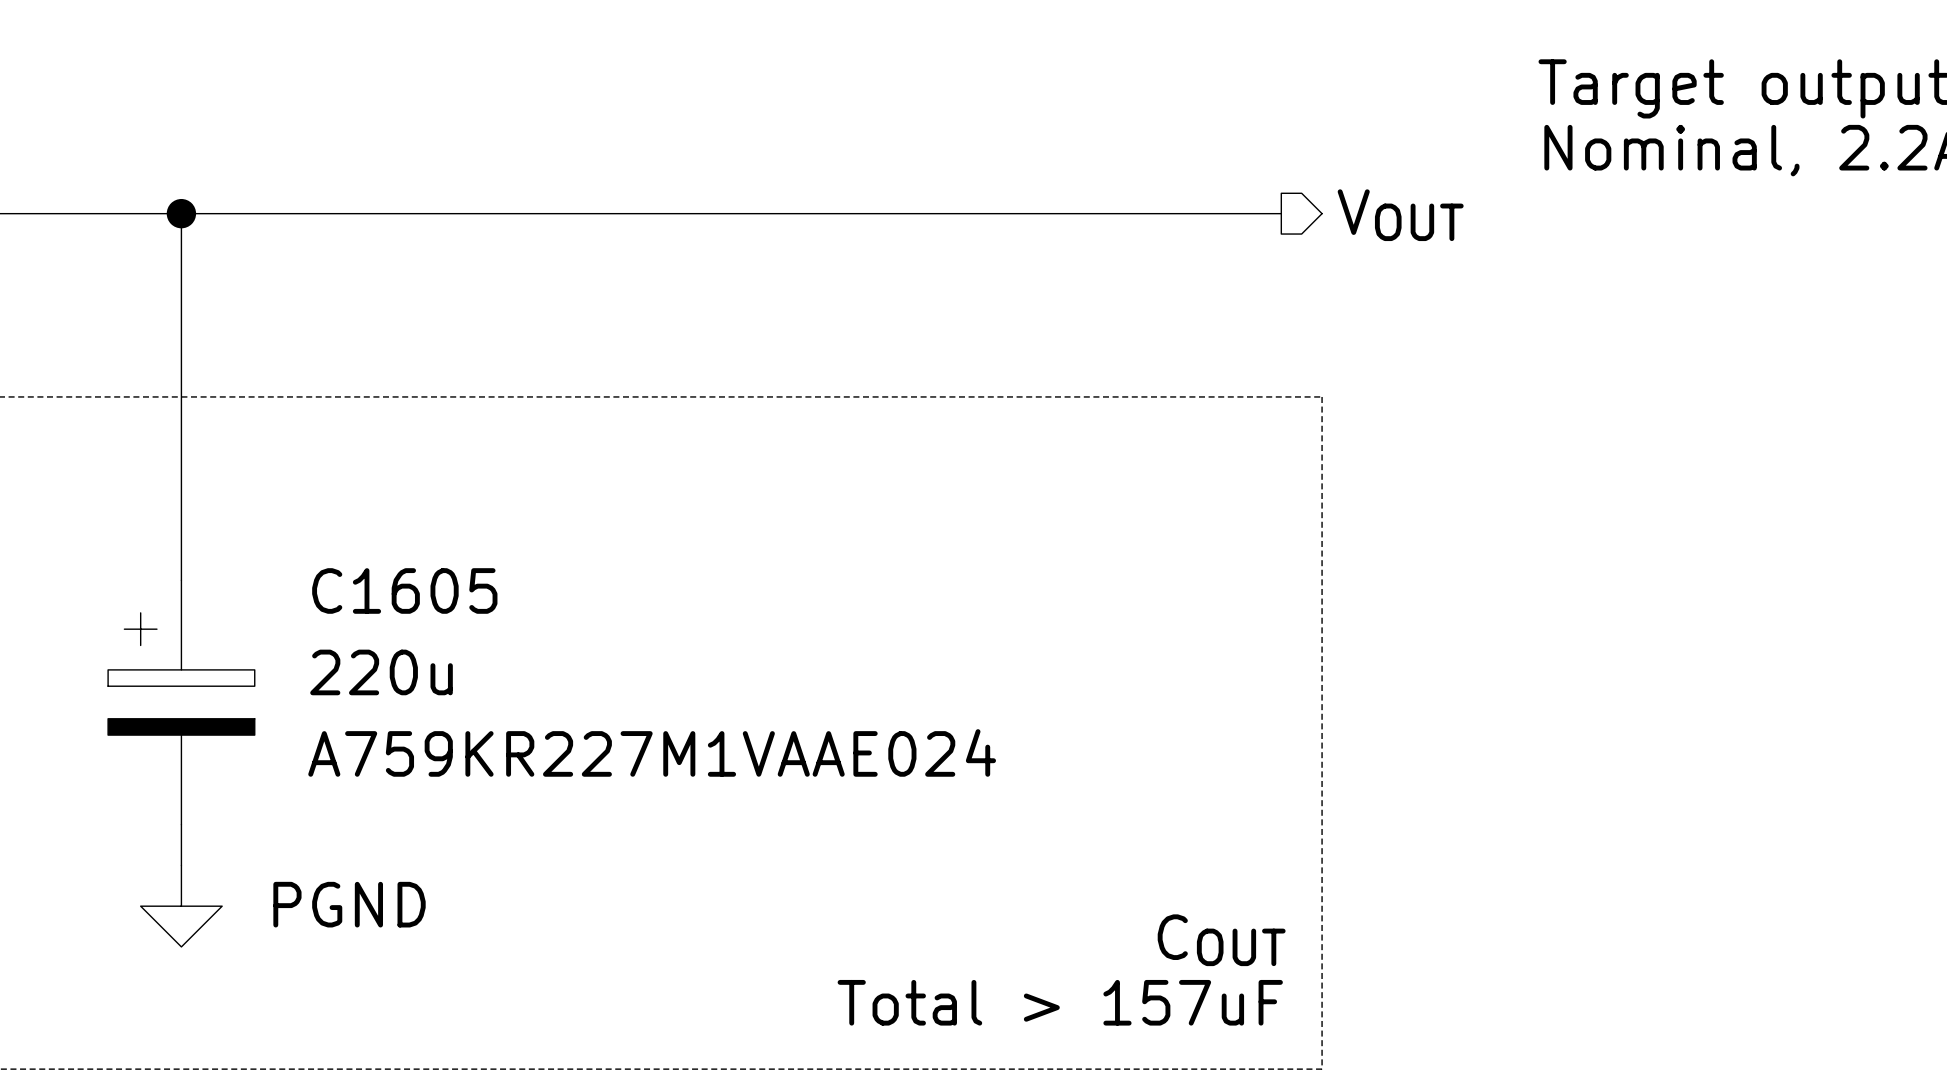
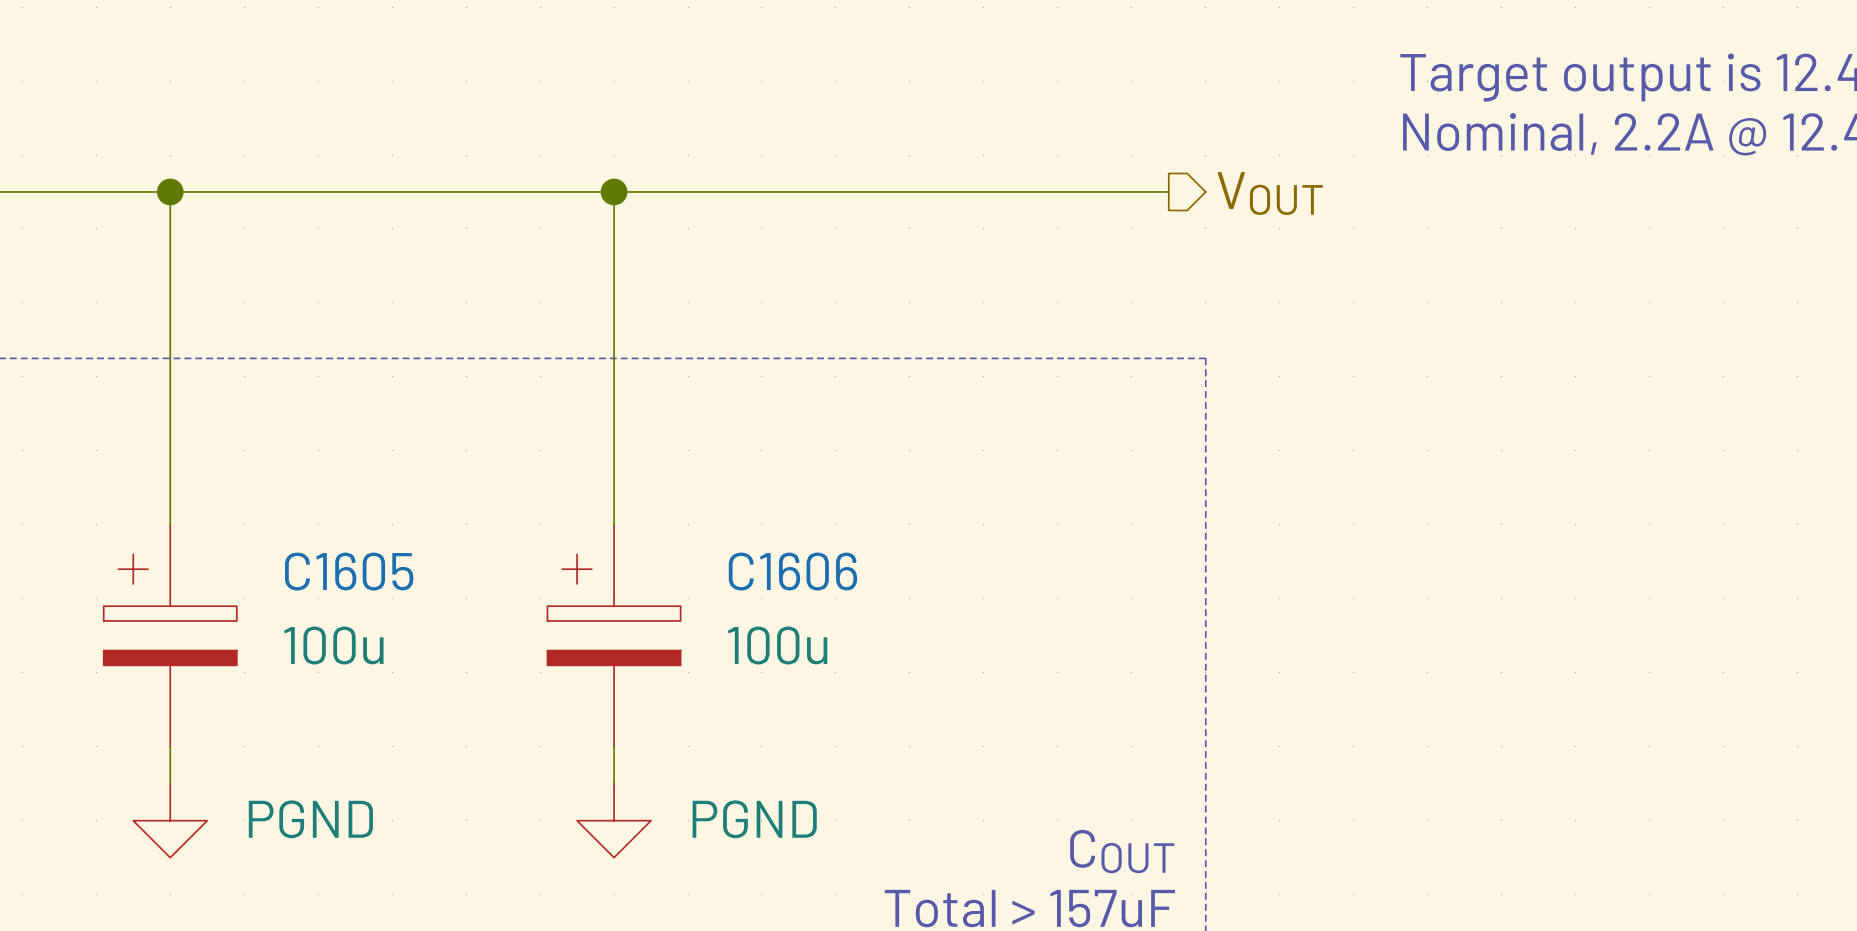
wire: none -> (614, 191) (614, 524)
junction: none -> (614, 191)
C1605 name position: C1605 (404, 590) -> C1605 (349, 571)
C1605 value: 220u (381, 672) -> 100u (333, 645)
C1606: none -> 100u (614, 635)
C1605 text: A759KR227M1VAAE024 (652, 752) -> none
wire: none -> (614, 746) (614, 783)
power symbol: none -> PGND (614, 820)

